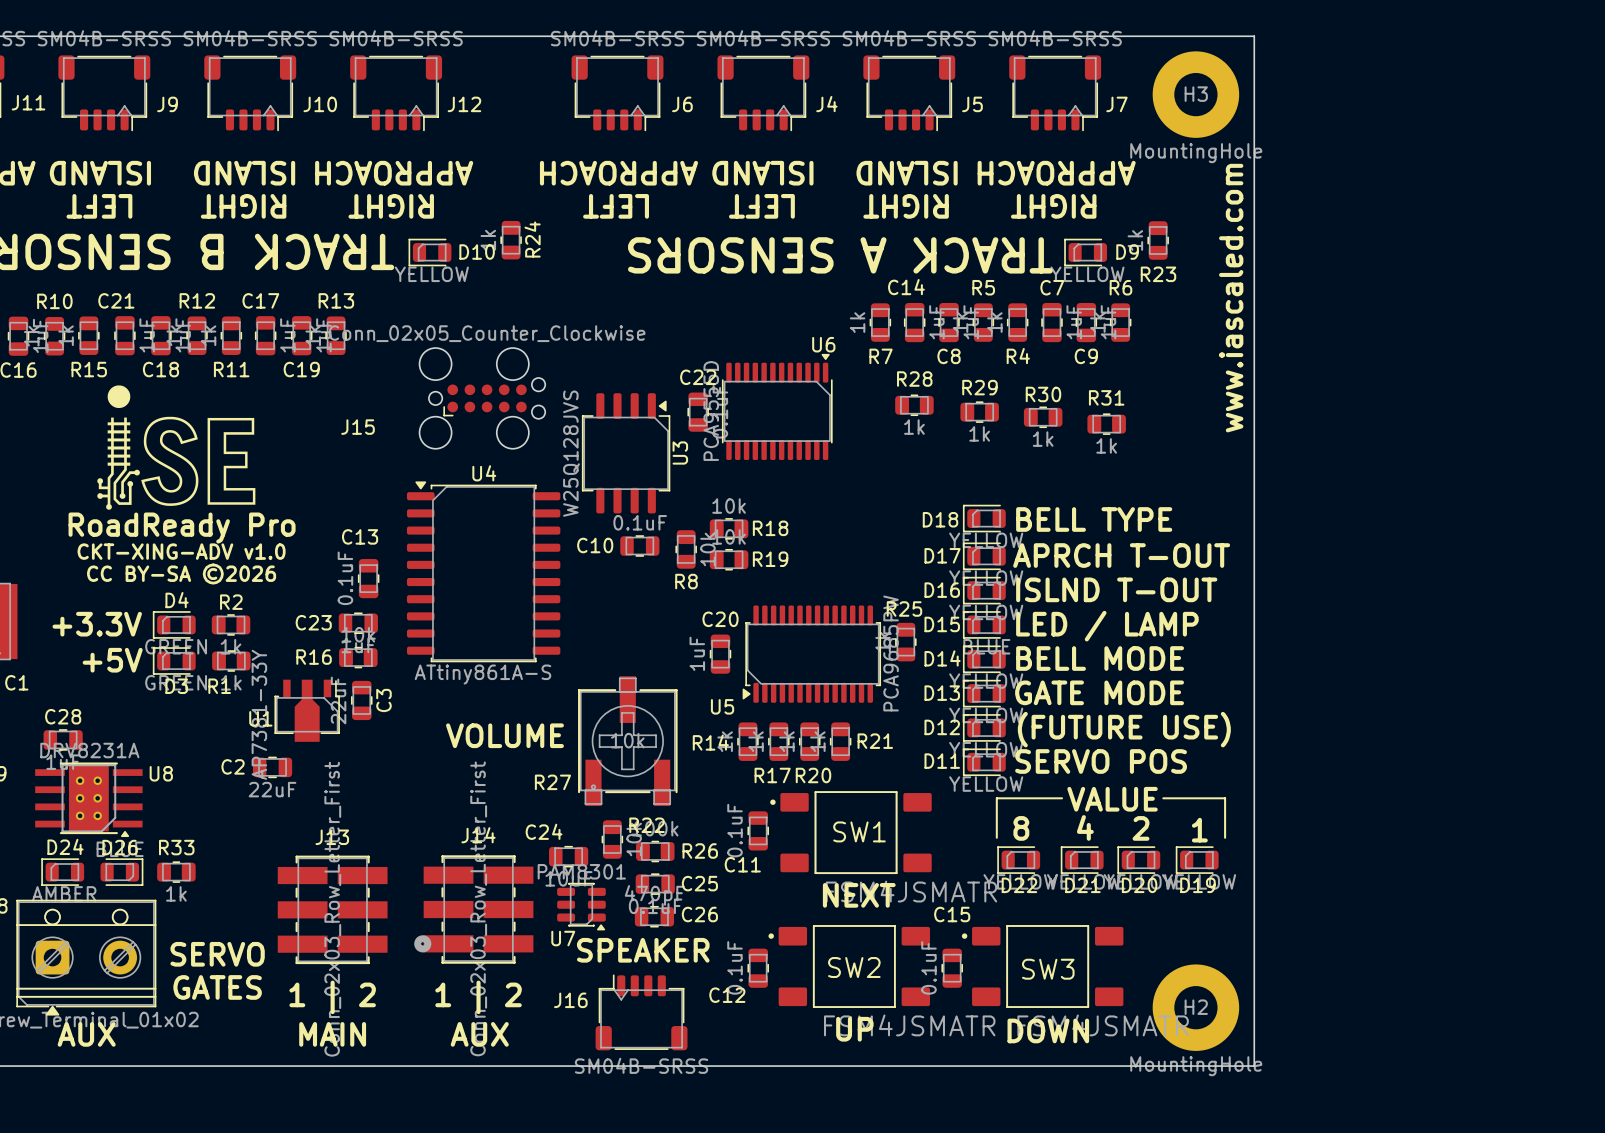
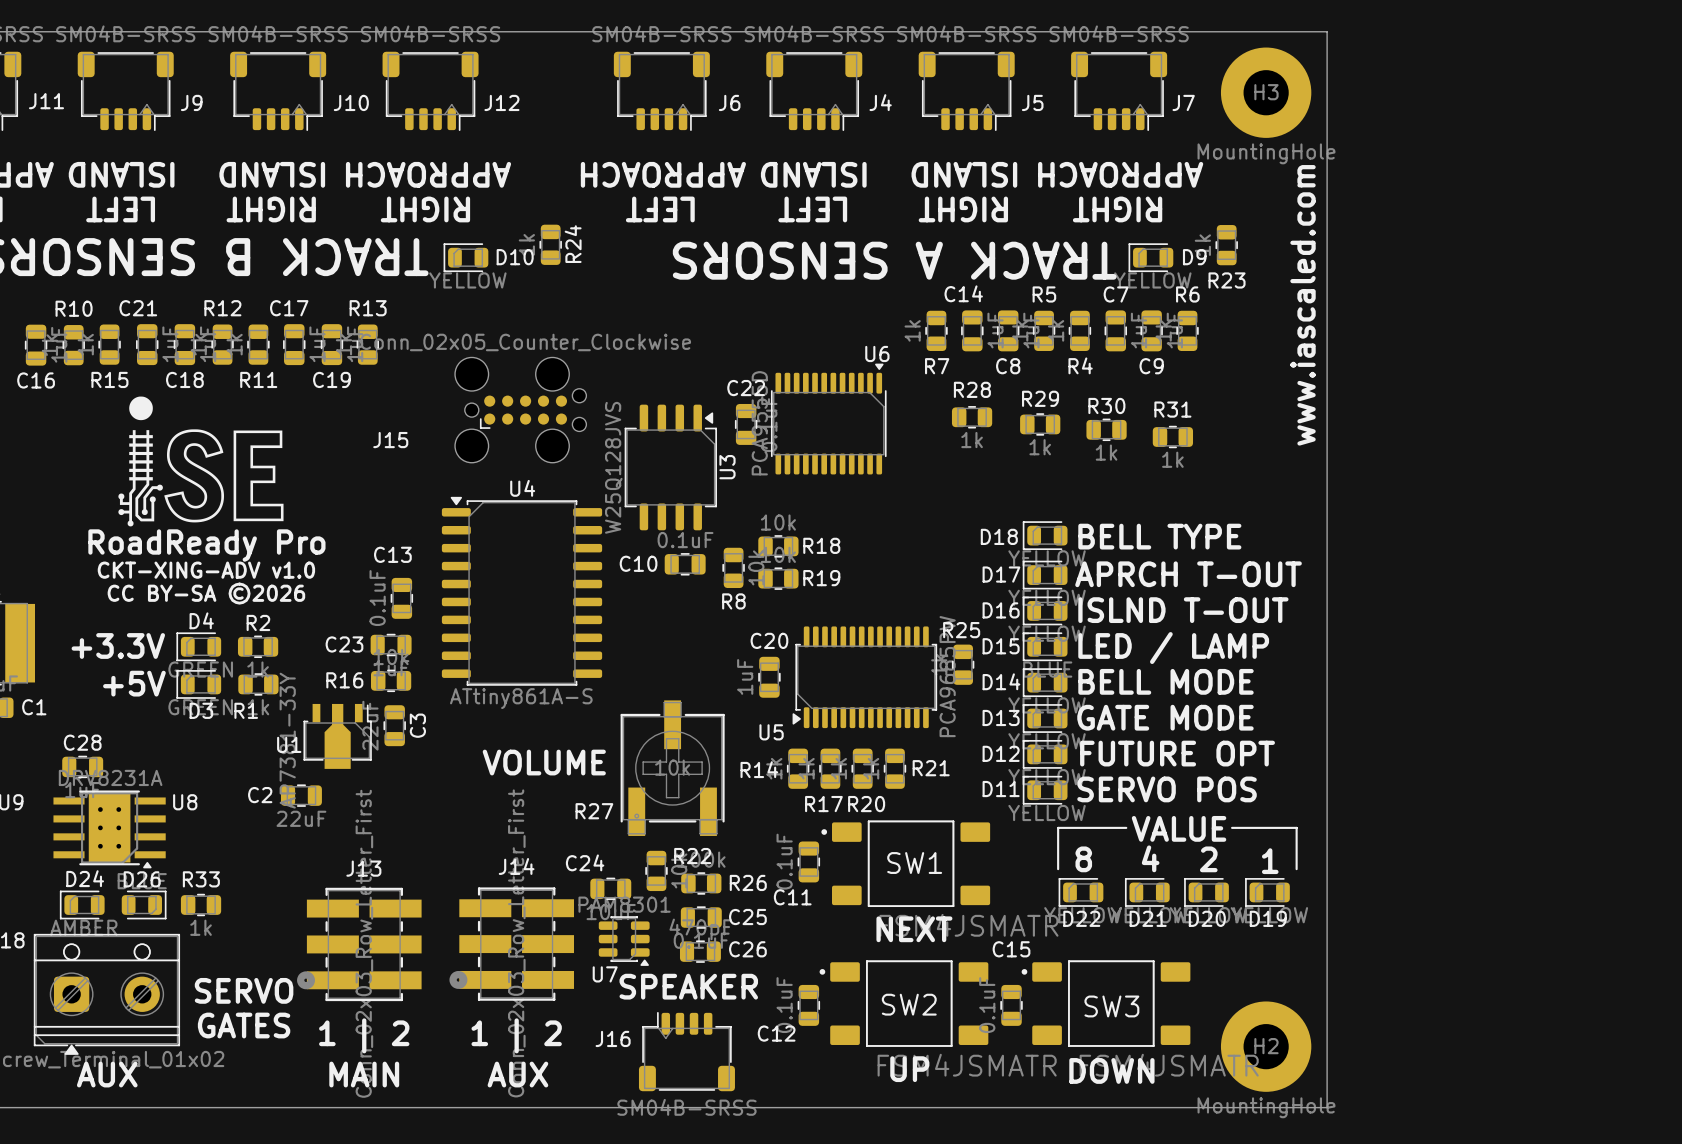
text: (FUTURE USE) (1124, 729) -> FUTURE OPT (1177, 753)
J13 footprint: [277, 855, 388, 965] -> [297, 887, 422, 1002]

